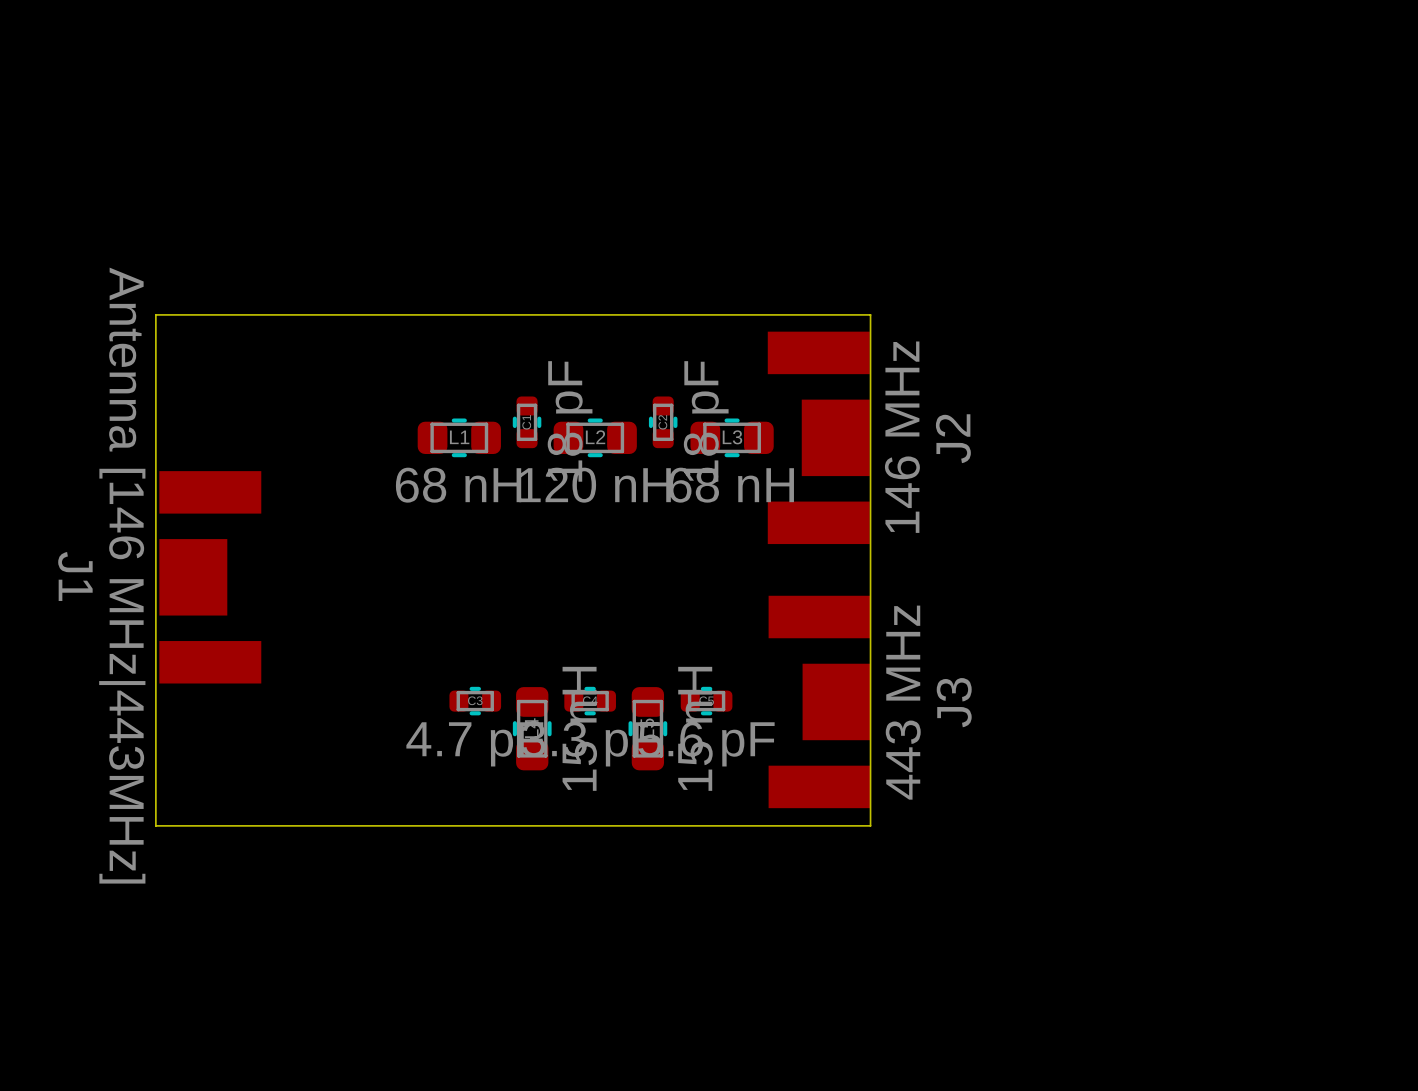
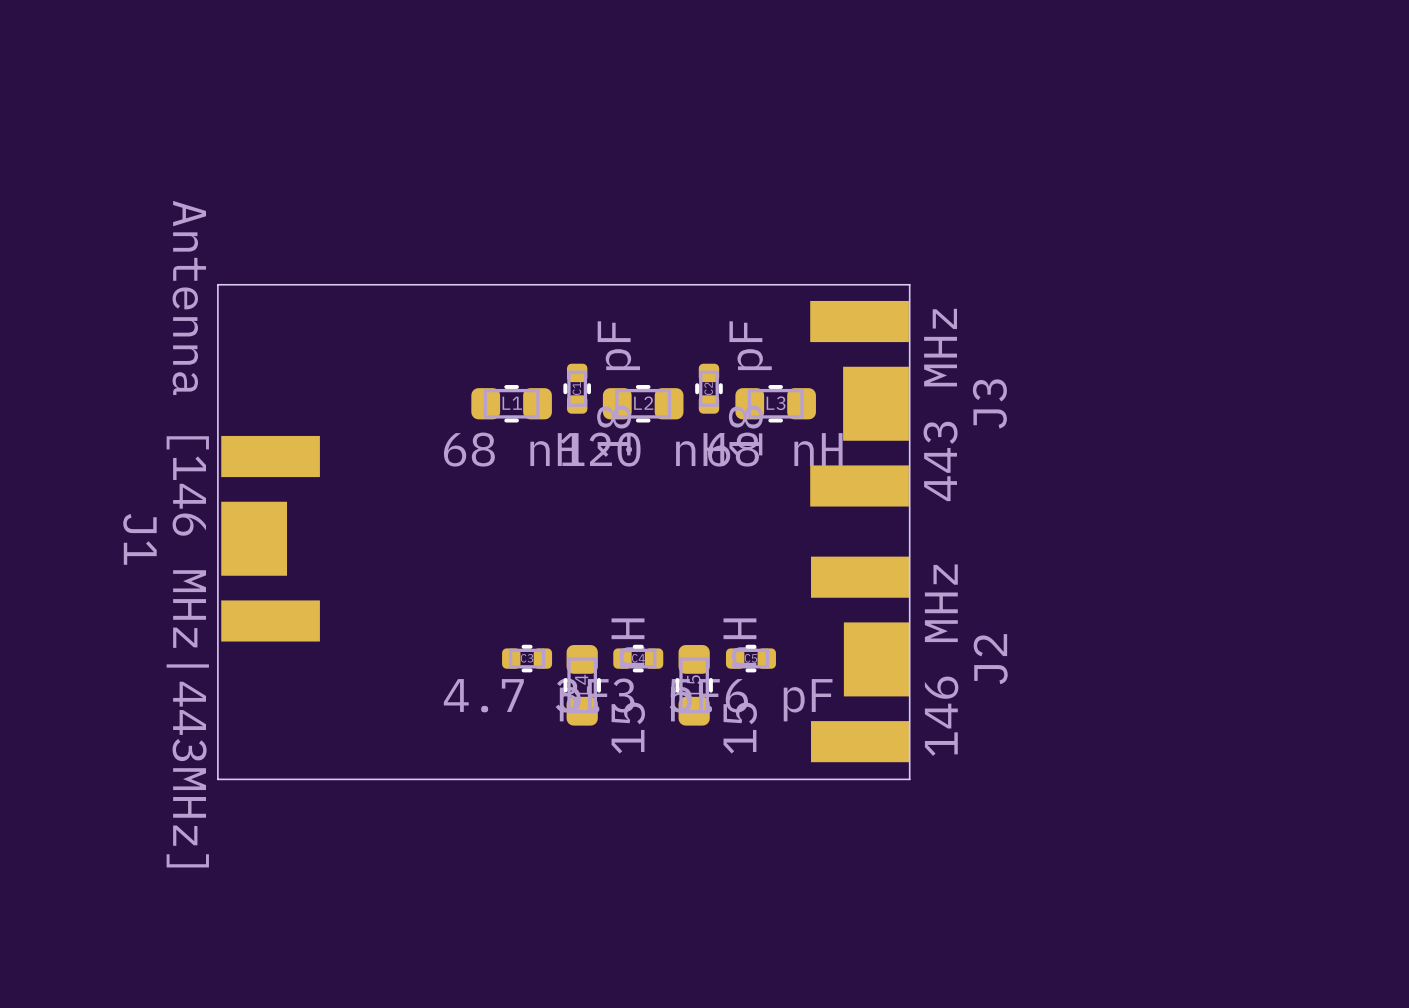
J2 value: 146 MHz (902, 437) -> 443 MHz (940, 404)
J2 name: J2 (953, 438) -> J3 (989, 403)
J3 value: 443 MHz (903, 702) -> 146 MHz (941, 660)
J3 name: J3 (954, 702) -> J2 (990, 659)

